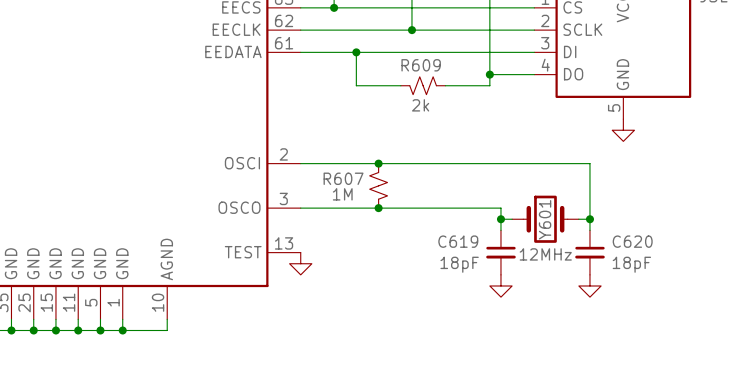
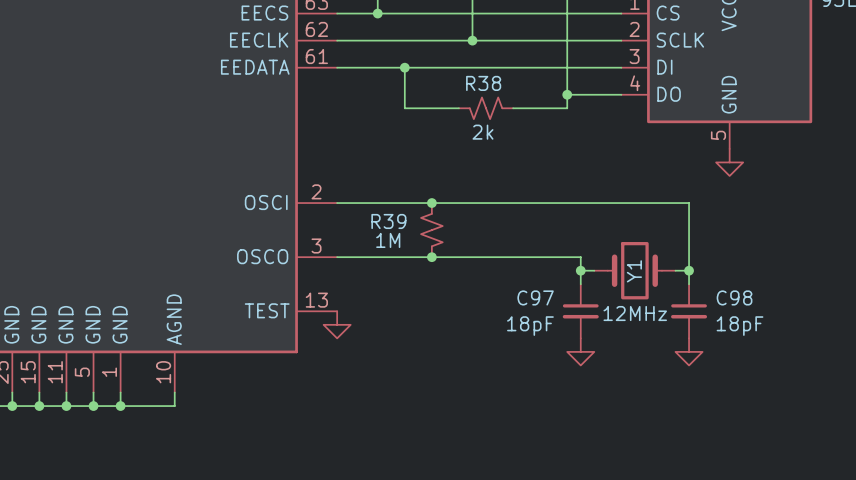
R609 name: R609 (421, 65) -> R38 (483, 83)
R607 name: R607 (343, 178) -> R39 (388, 221)
Y601 name: Y601 (545, 219) -> Y1 (634, 271)
C619 name: C619 (458, 241) -> C97 (535, 297)
C620 name: C620 (632, 241) -> C98 (734, 297)

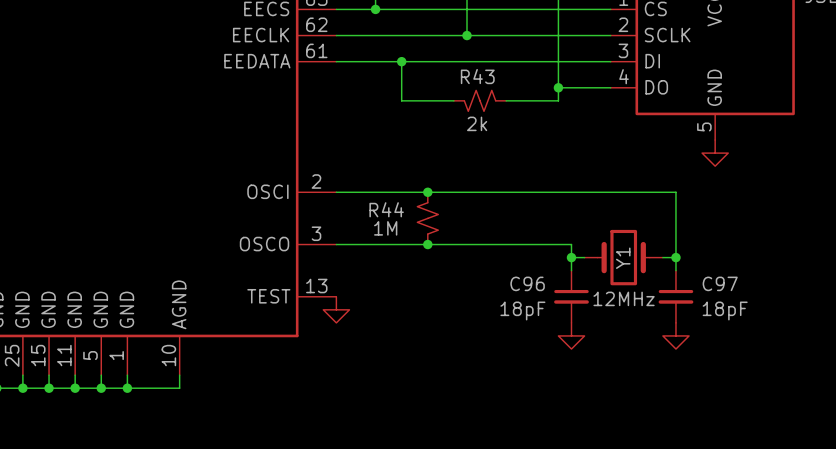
R38 name: R38 (483, 83) -> R43 (477, 76)
R39 name: R39 (388, 221) -> R44 (386, 209)
C97 name: C97 (535, 297) -> C96 (527, 283)
C98 name: C98 (734, 297) -> C97 (720, 283)

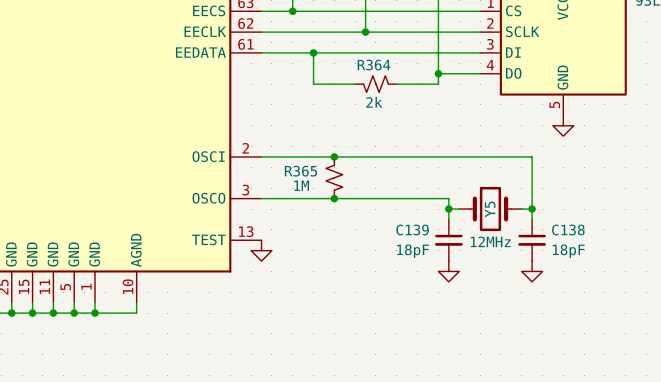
R43 name: R43 (477, 76) -> R364 (374, 65)
R44 name: R44 (386, 209) -> R365 (300, 171)
Y1 name: Y1 (623, 258) -> Y5 (490, 209)
C96 name: C96 (527, 283) -> C139 (412, 229)
C97 name: C97 (720, 283) -> C138 (568, 229)

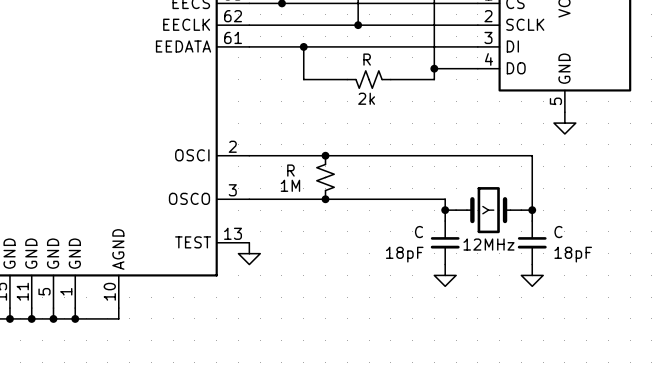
R364 name: R364 (374, 65) -> R (367, 59)
R365 name: R365 (300, 171) -> R (290, 170)
Y5 name: Y5 (490, 209) -> Y (488, 210)
C139 name: C139 (412, 229) -> C (418, 232)
C138 name: C138 (568, 229) -> C (558, 232)

